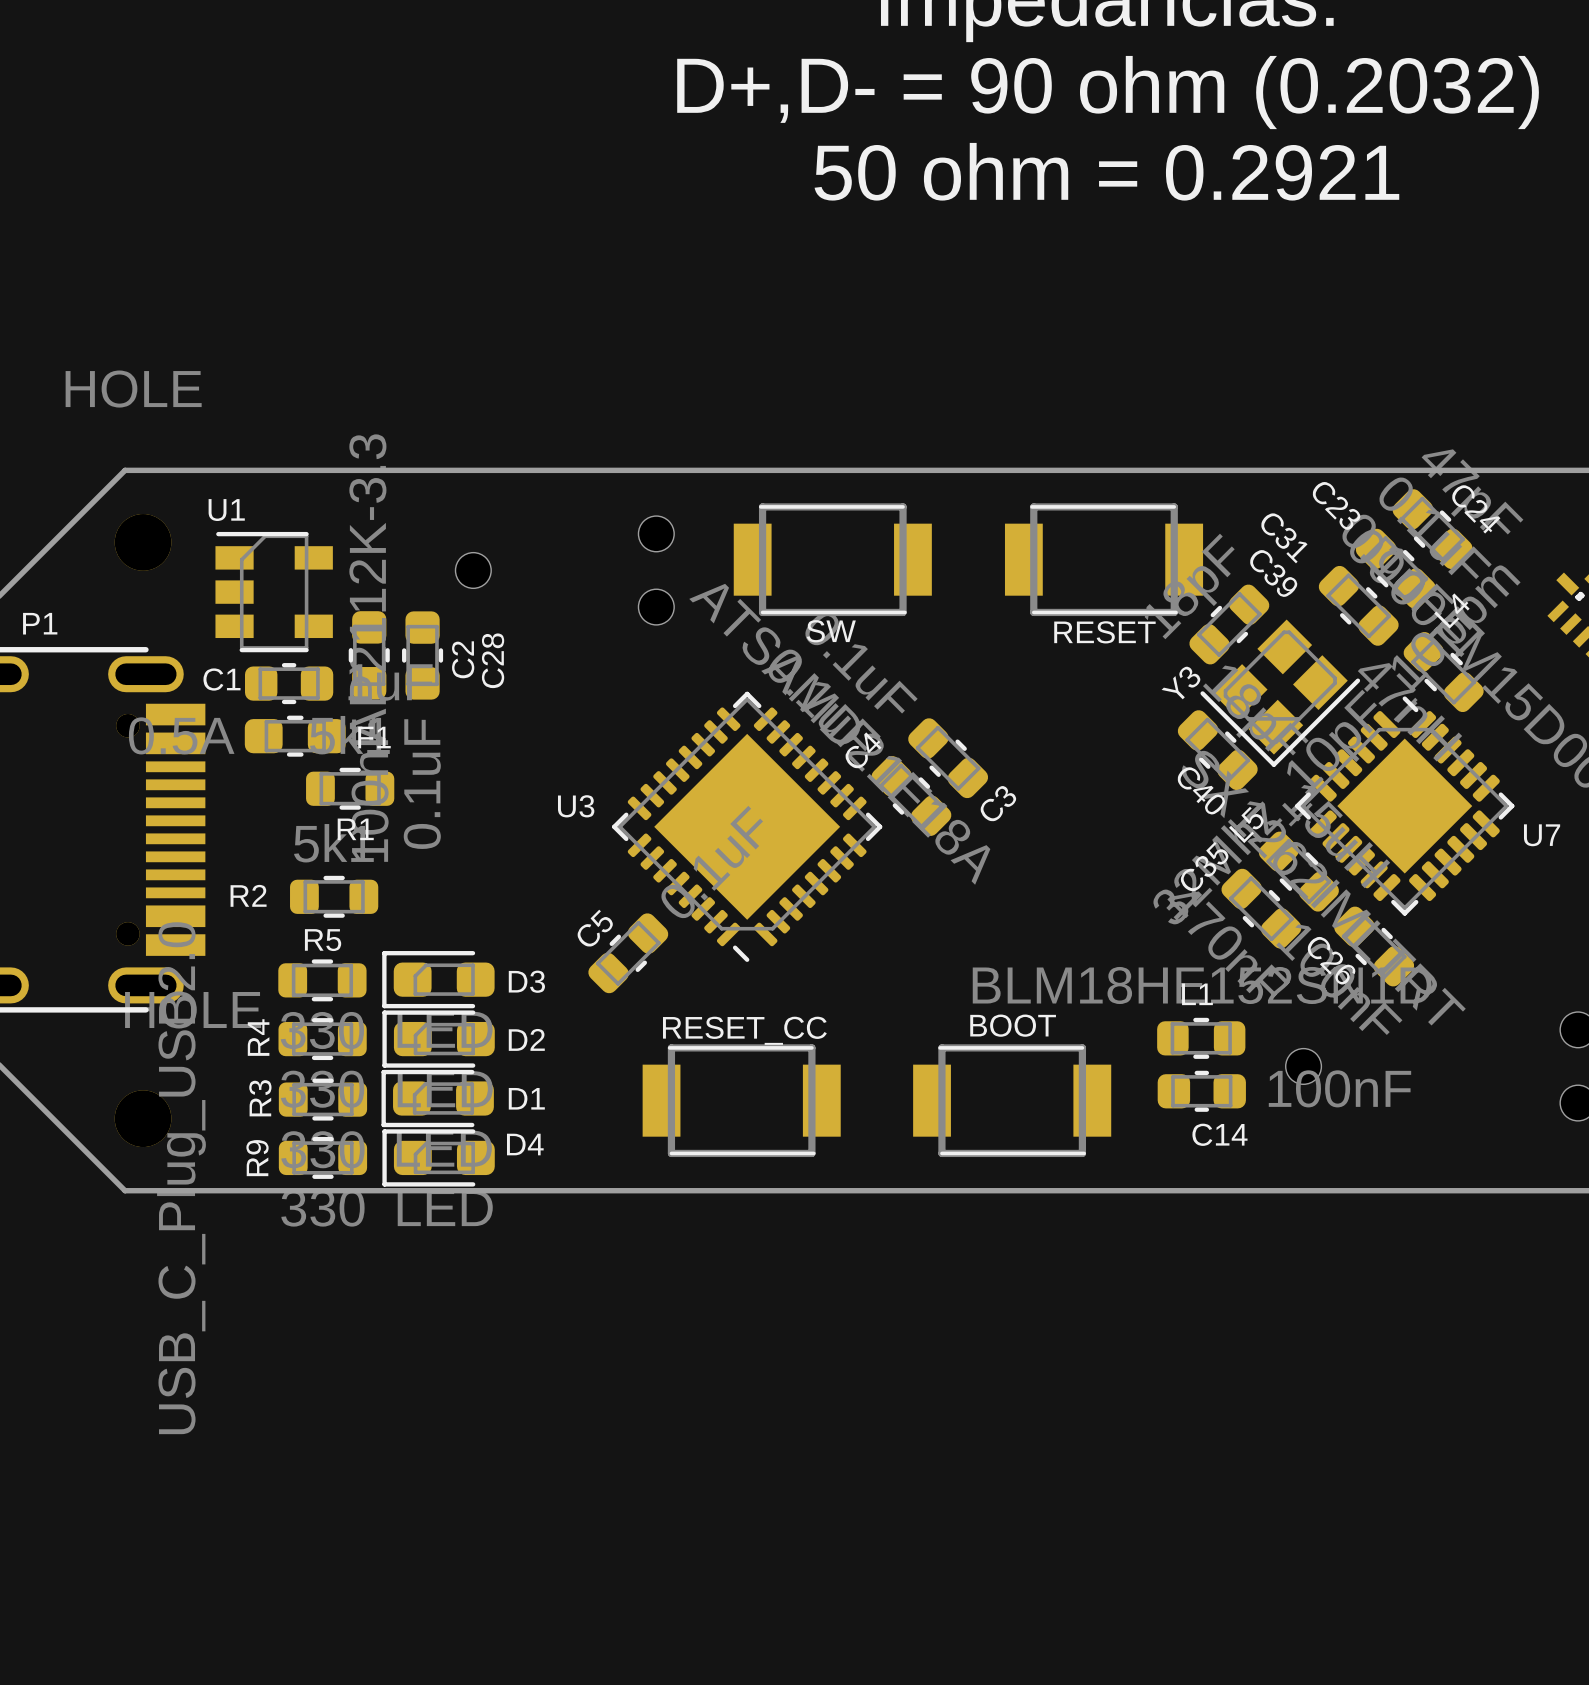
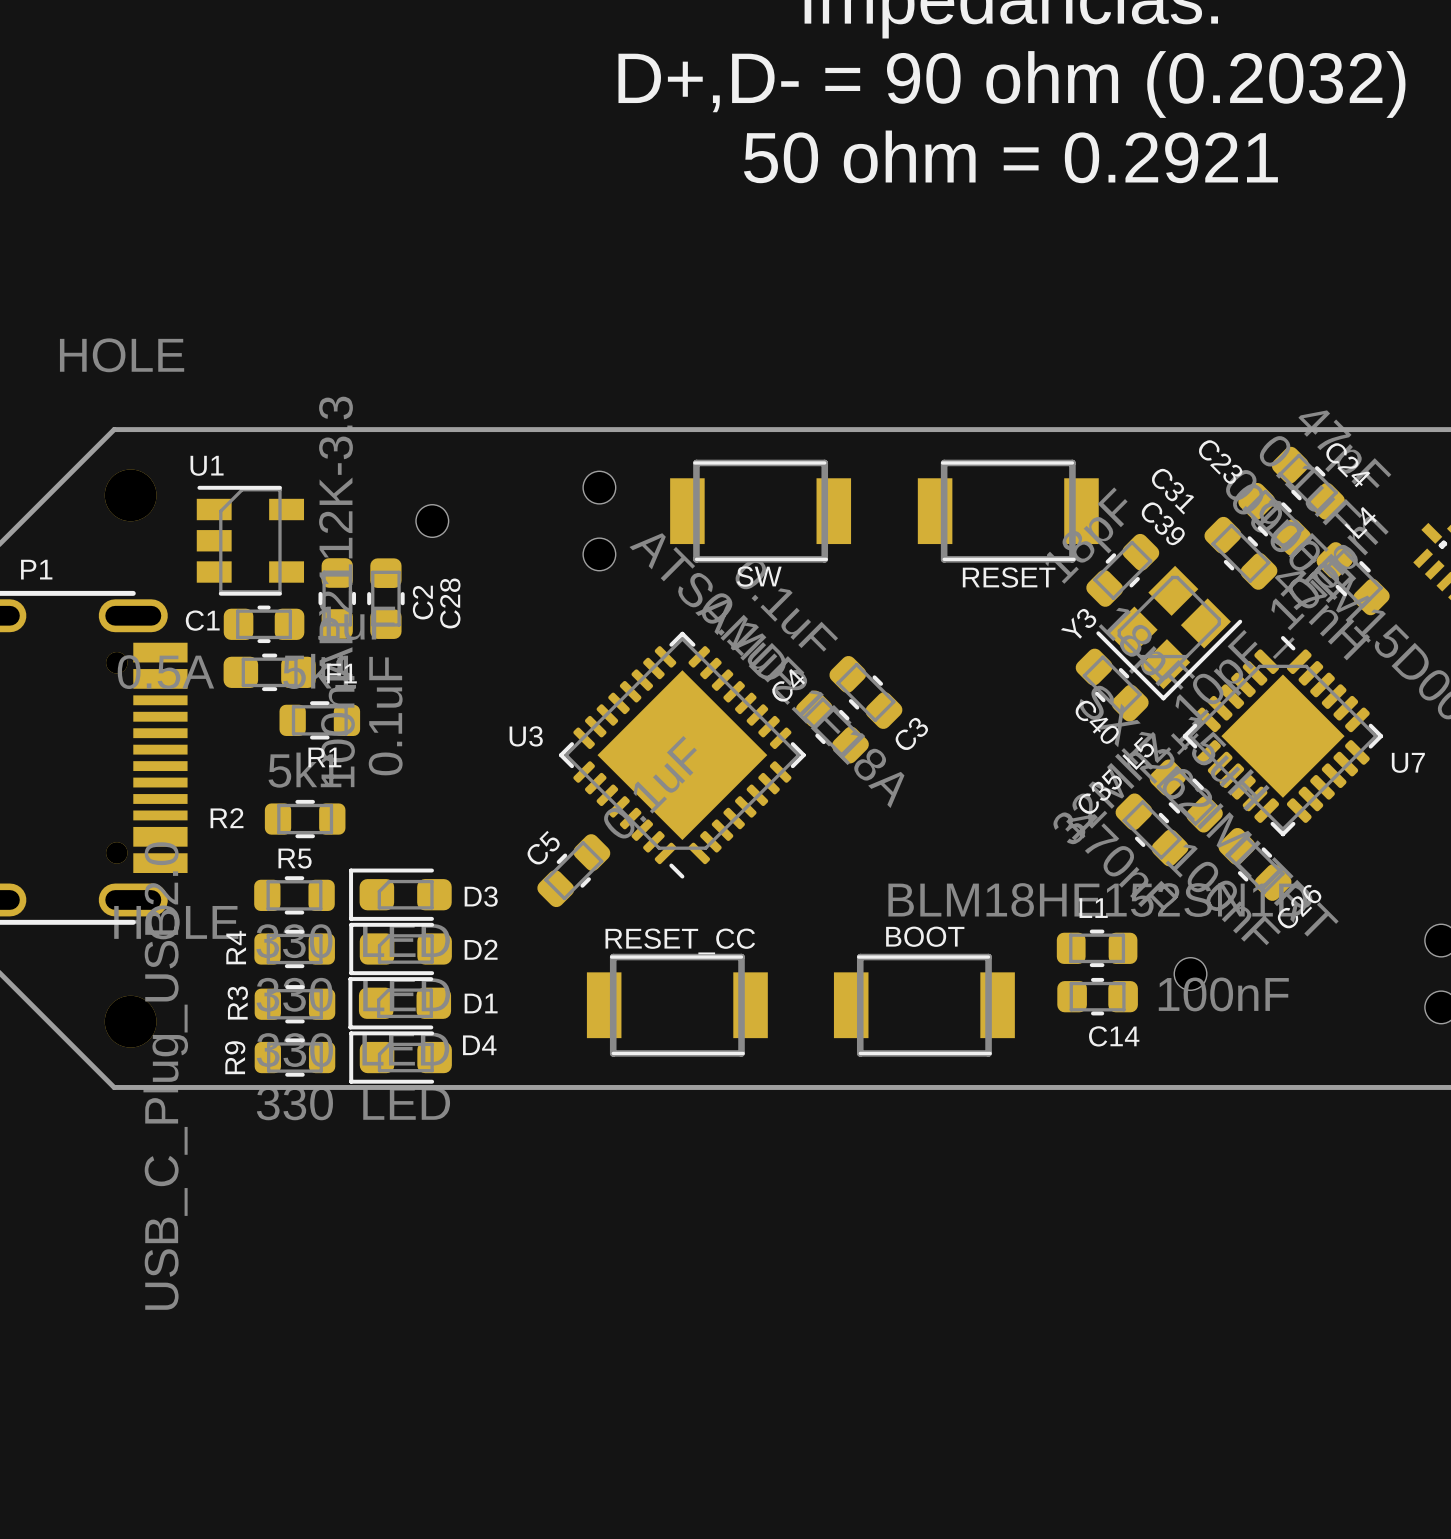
L4 position: (1443, 672) -> (1353, 578)
C26 name rotation: 0° (1332, 960) -> 90° counterclockwise (1299, 906)
C26 name position: C26 (1332, 960) -> C26 (1299, 906)

